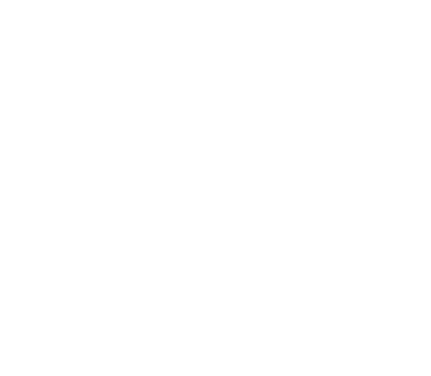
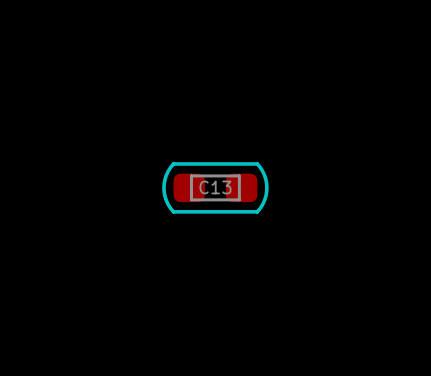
C13: none -> (215, 187)

